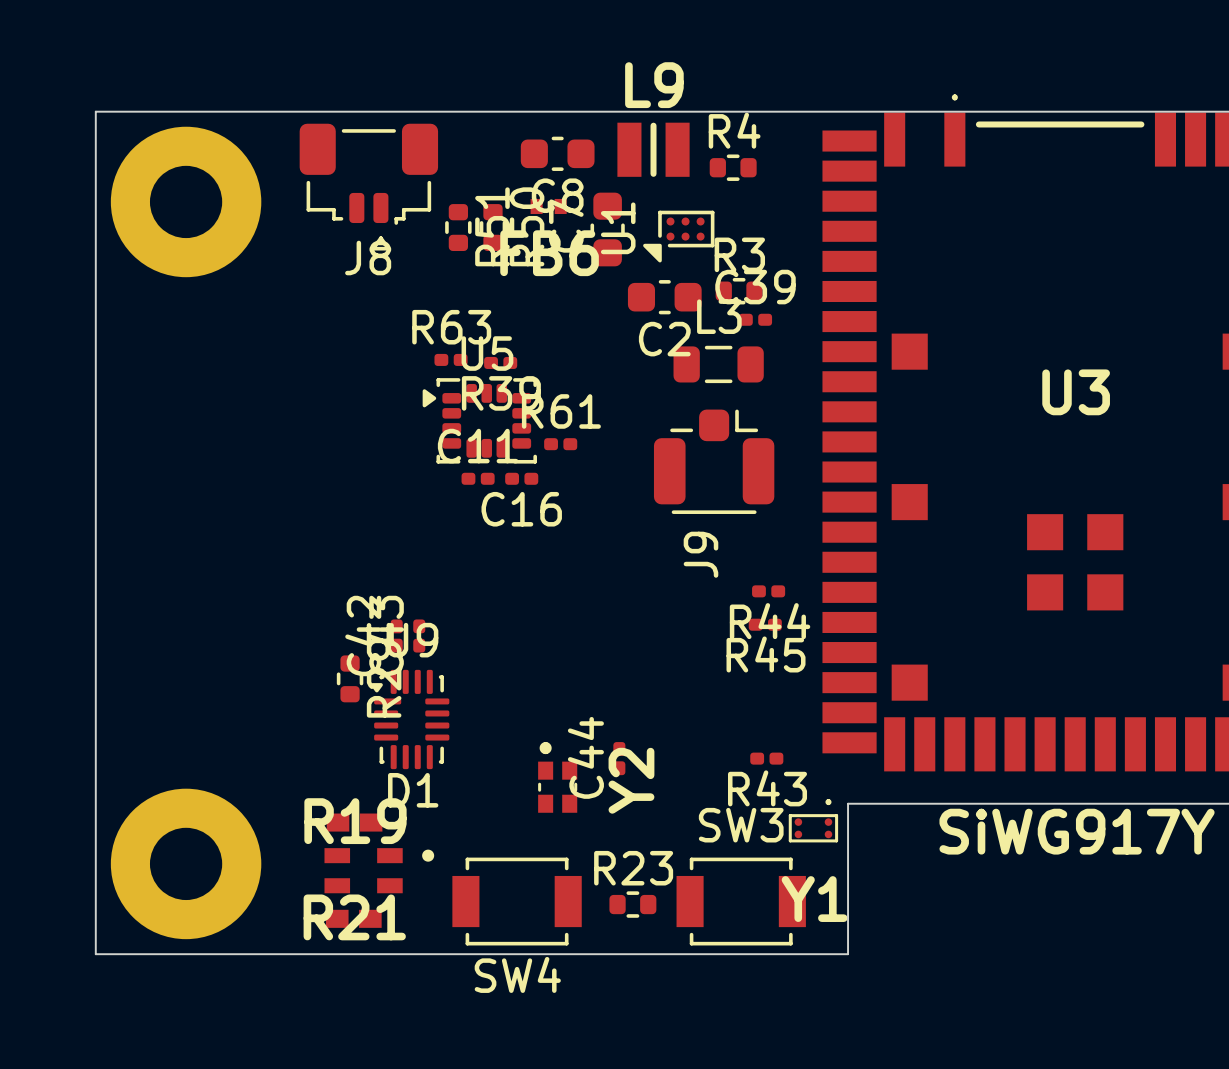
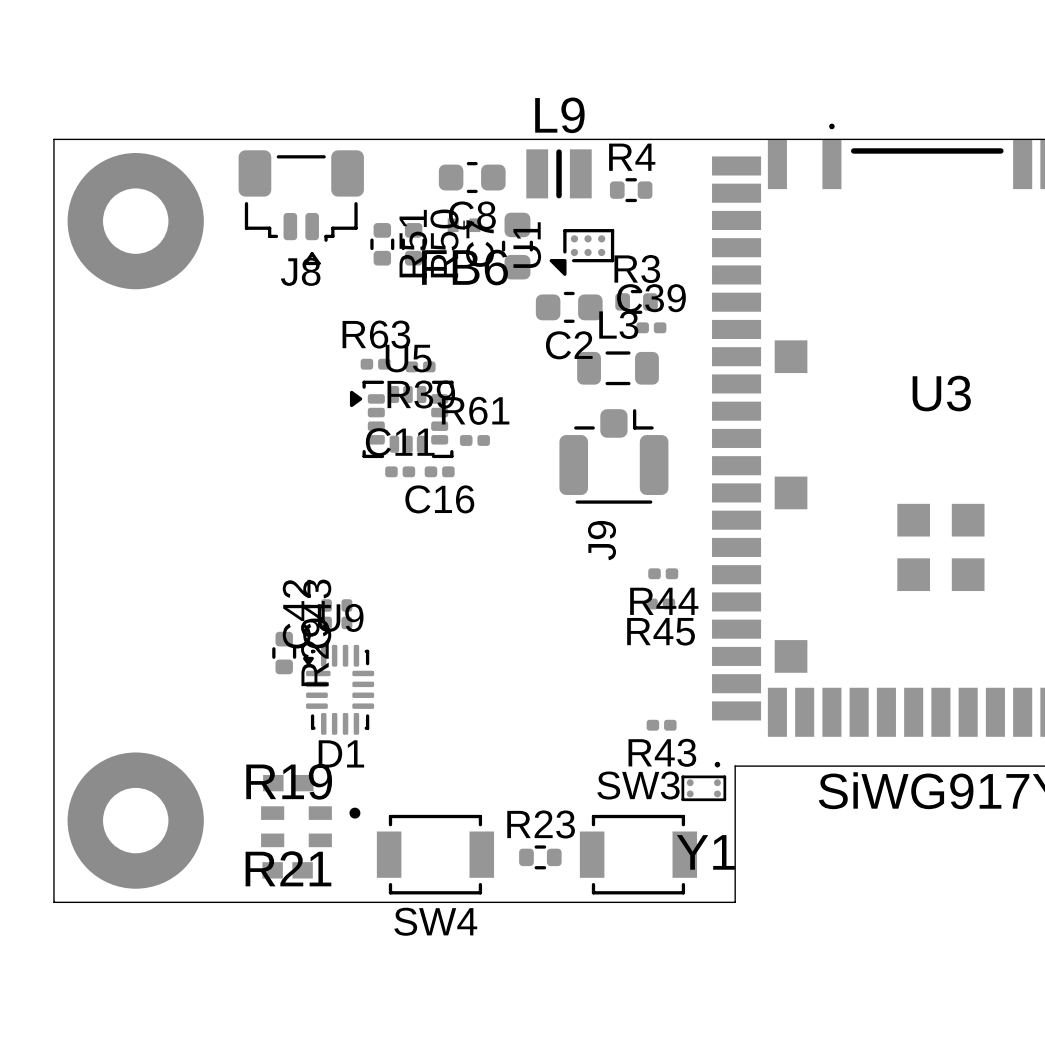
C44: (619, 758) -> none
Y2: (557, 777) -> none

